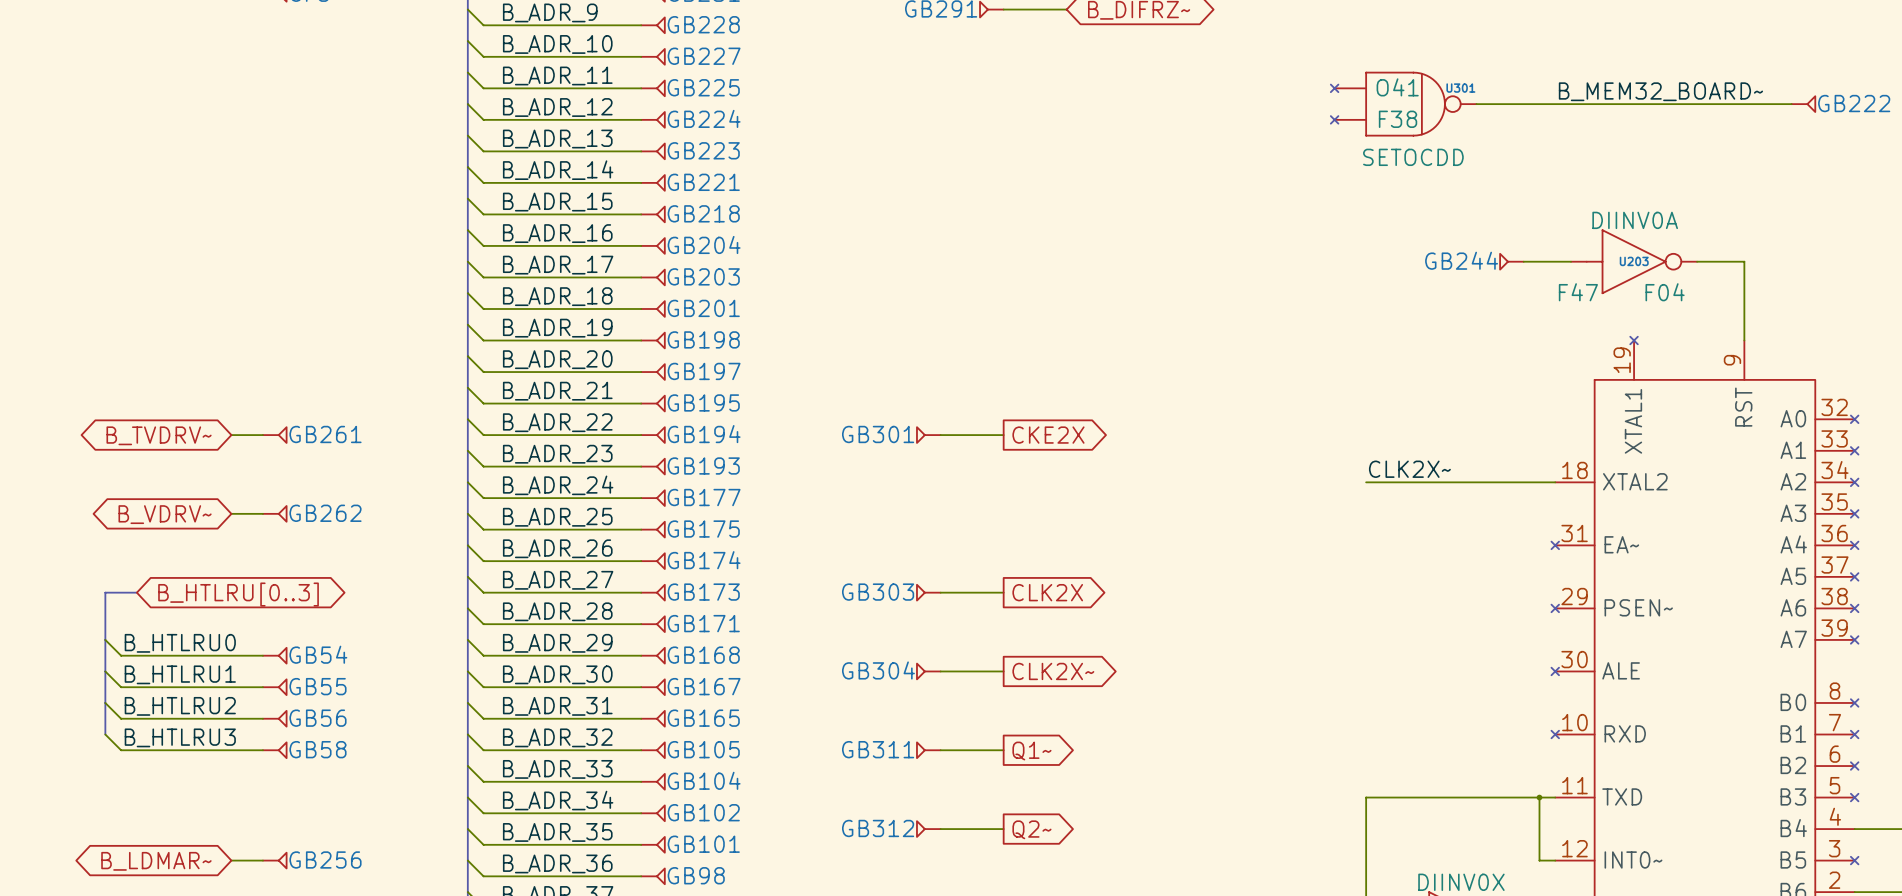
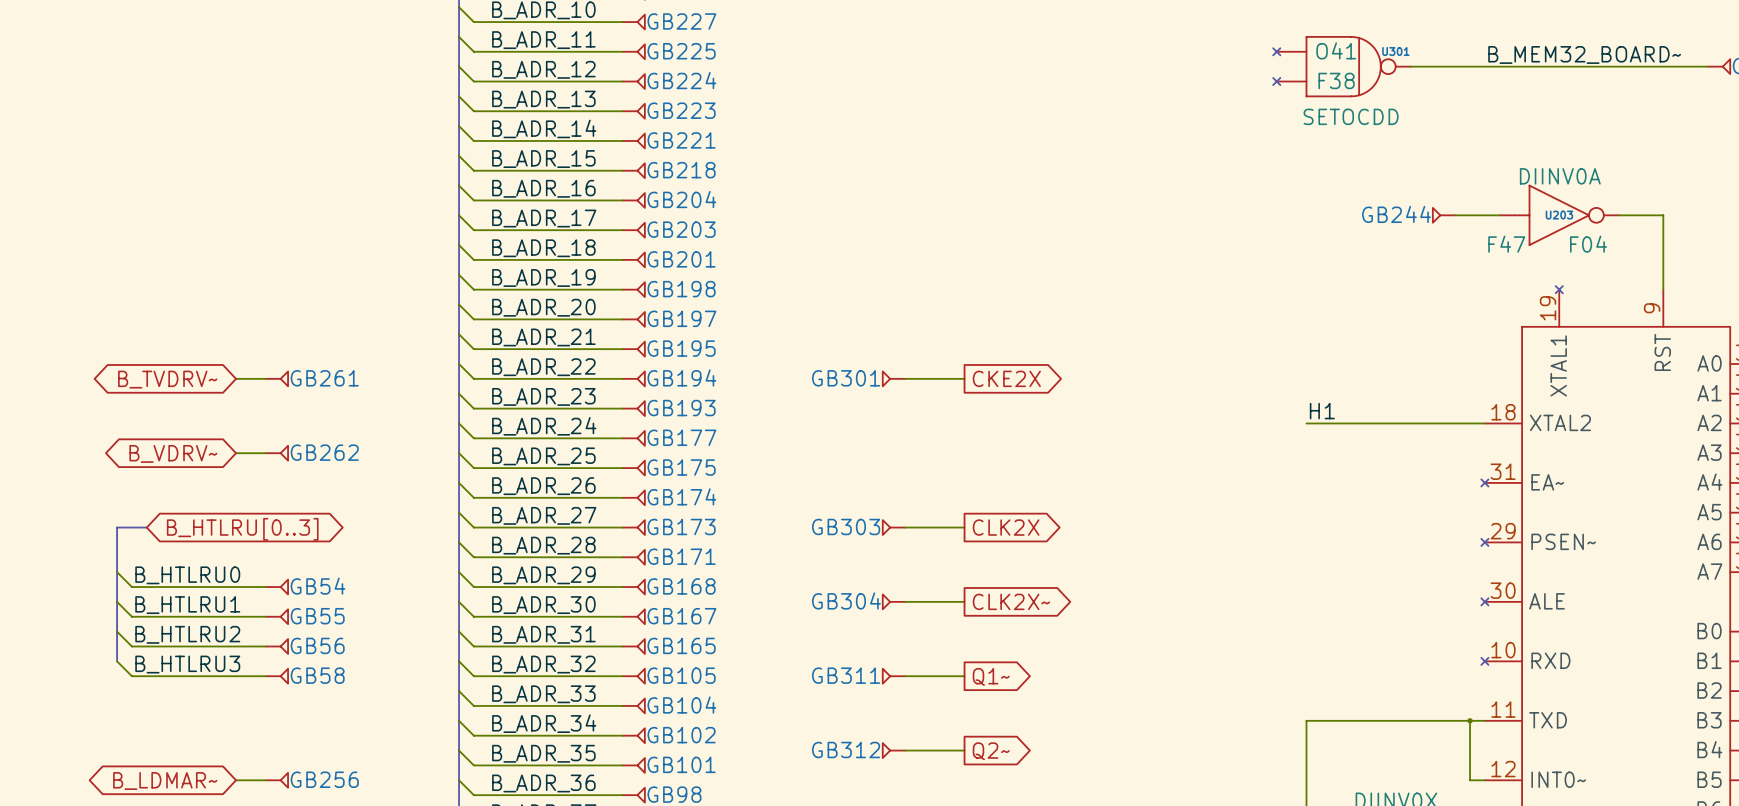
label: CLK2X~ (1409, 469) -> H1 (1322, 411)

